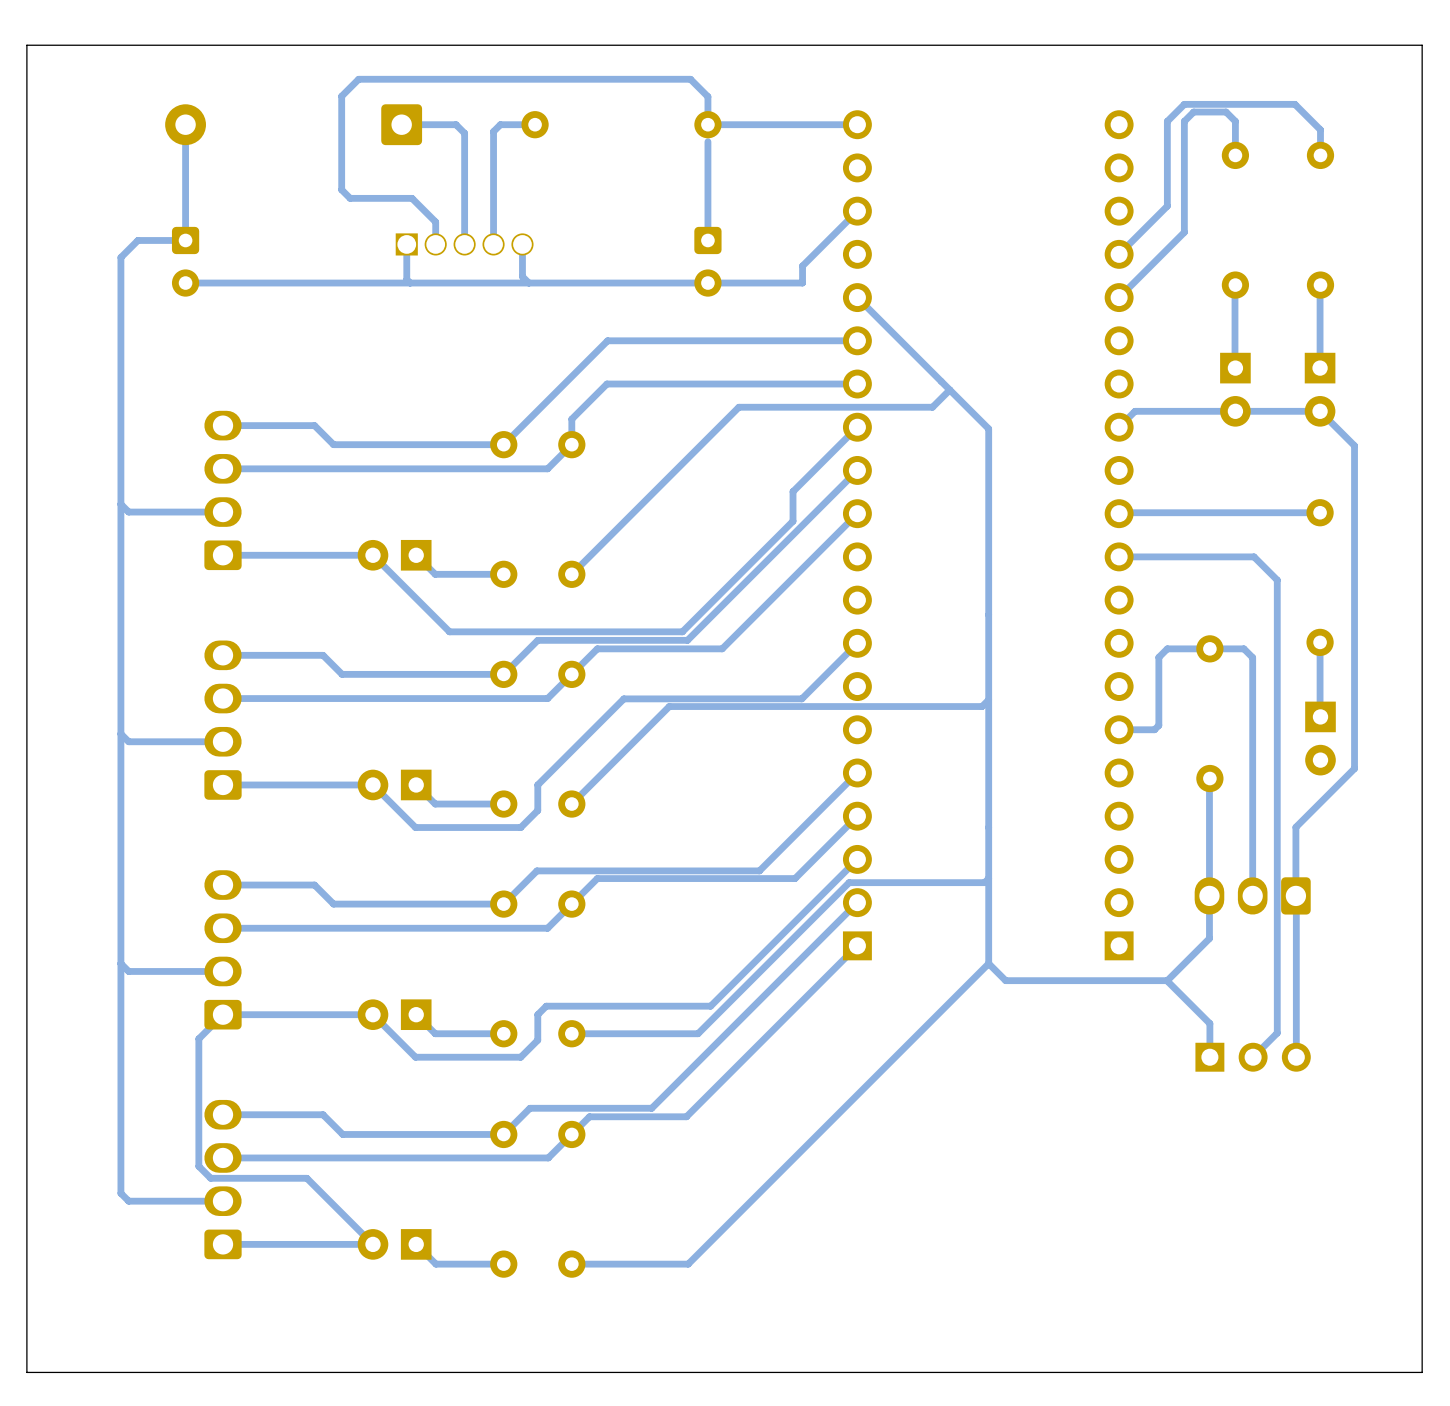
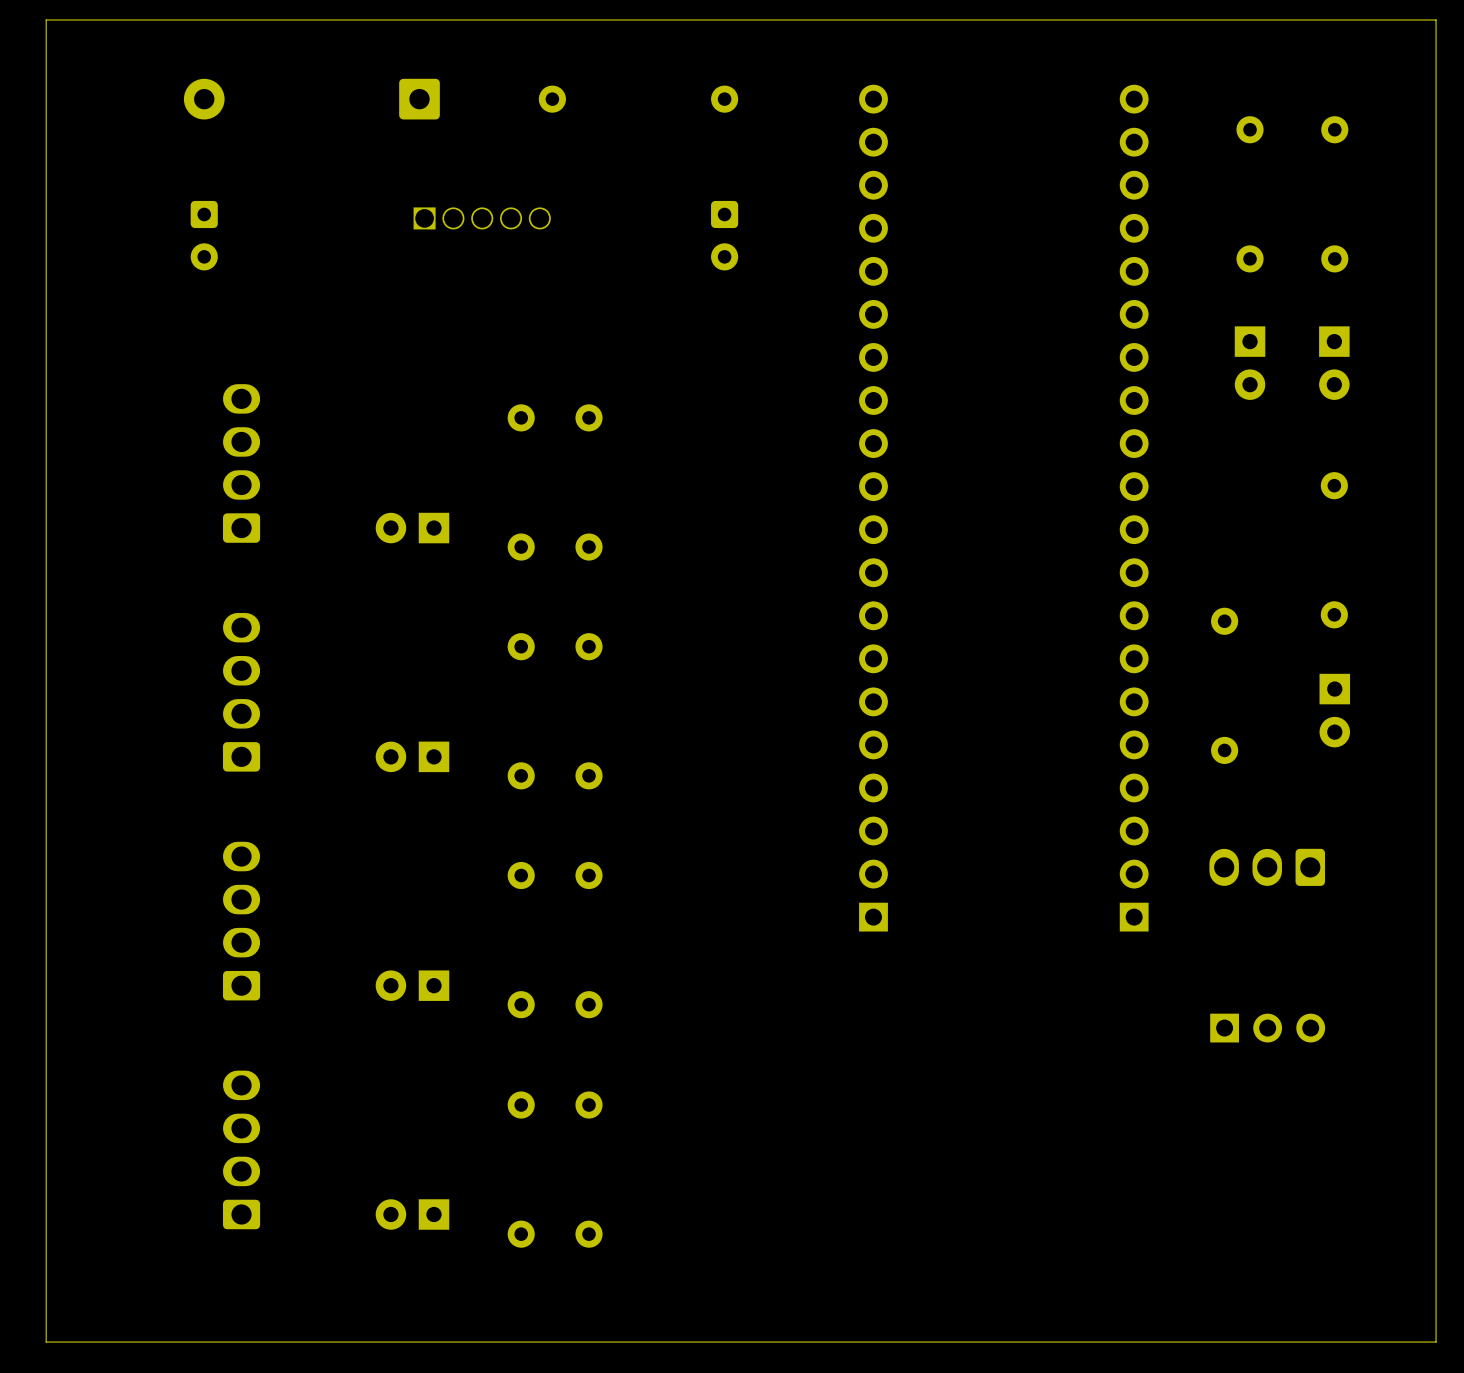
track: (185, 124) (185, 240) (137, 240) (120, 257) (120, 1193) (128, 1201) (223, 1201) -> none
track: (401, 124) (456, 124) (464, 133) (464, 244) -> none
track: (535, 124) (500, 124) (493, 131) (493, 244) -> none
track: (857, 124) (707, 124) (707, 96) (690, 79) (358, 79) (341, 96) (341, 189) (350, 198) (412, 198) (435, 222) (435, 244) -> none
track: (707, 141) (707, 240) -> none
track: (1235, 155) (1235, 121) (1226, 112) (1193, 112) (1184, 121) (1184, 232) (1119, 297) -> none
track: (1320, 155) (1320, 129) (1294, 104) (1184, 104) (1167, 121) (1167, 206) (1119, 254) -> none
track: (857, 211) (802, 266) (802, 283) (180, 283) -> none
track: (406, 244) (406, 279) (410, 283) -> none
track: (522, 244) (522, 276) (528, 283) -> none
track: (1235, 285) (1235, 363) -> none
track: (1320, 285) (1320, 368) -> none
track: (857, 297) (988, 428) (988, 878) -> none
track: (857, 340) (607, 340) (503, 444) (333, 444) (314, 425) (223, 425) -> none
track: (857, 384) (606, 384) (571, 419) (571, 444) (547, 468) (223, 468) -> none
track: (949, 389) (932, 407) (738, 407) (571, 574) -> none
track: (857, 427) (793, 491) (793, 521) (682, 631) (449, 631) (372, 555) (223, 555) -> none
track: (1119, 428) (1135, 411) (1320, 411) (1354, 445) (1354, 768) (1295, 827) (1296, 1057) -> none
track: (857, 470) (687, 640) (537, 640) (503, 674) (342, 674) (323, 655) (223, 655) -> none
track: (120, 504) (128, 512) (223, 512) -> none
track: (857, 513) (722, 648) (597, 648) (547, 698) (223, 698) -> none
track: (1119, 513) (1320, 512) (1320, 521) -> none
track: (416, 555) (435, 574) (503, 574) -> none
track: (1119, 556) (1254, 556) (1277, 580) (1277, 1033) (1253, 1057) -> none
track: (1320, 642) (1320, 716) -> none
track: (857, 643) (801, 698) (623, 698) (537, 784) (537, 810) (520, 827) (415, 827) (372, 784) (223, 784) -> none
track: (988, 699) (982, 706) (669, 706) (571, 804) -> none
track: (1119, 729) (1154, 729) (1158, 725) (1158, 657) (1167, 648) (1243, 648) (1252, 657) (1252, 895) -> none
track: (120, 733) (128, 741) (223, 741) -> none
track: (857, 772) (759, 870) (536, 870) (503, 904) (333, 904) (314, 885) (223, 885) -> none
track: (1209, 778) (1209, 938) (1167, 980) (1005, 980) (988, 963) -> none
track: (416, 784) (435, 804) (503, 804) -> none
track: (857, 816) (795, 878) (597, 878) (547, 928) (223, 928) -> none
track: (857, 859) (710, 1006) (546, 1006) (537, 1014) (537, 1040) (520, 1057) (415, 1057) (372, 1014) (223, 1014) (198, 1038) (198, 1166) (210, 1178) (306, 1178) (372, 1244) (223, 1244) -> none
track: (988, 878) (988, 963) -> none
track: (988, 878) (984, 882) (849, 882) (698, 1033) (571, 1033) -> none
track: (857, 902) (651, 1108) (529, 1108) (503, 1134) (342, 1134) (323, 1114) (223, 1114) -> none
track: (857, 949) (857, 945) (686, 1116) (589, 1116) (548, 1157) (223, 1157) -> none
track: (120, 963) (128, 971) (223, 971) -> none
track: (988, 963) (688, 1264) (571, 1264) -> none
track: (1166, 980) (1209, 1023) (1209, 1057) -> none
track: (416, 1014) (435, 1033) (503, 1033) -> none
track: (416, 1244) (435, 1264) (503, 1264) -> none

